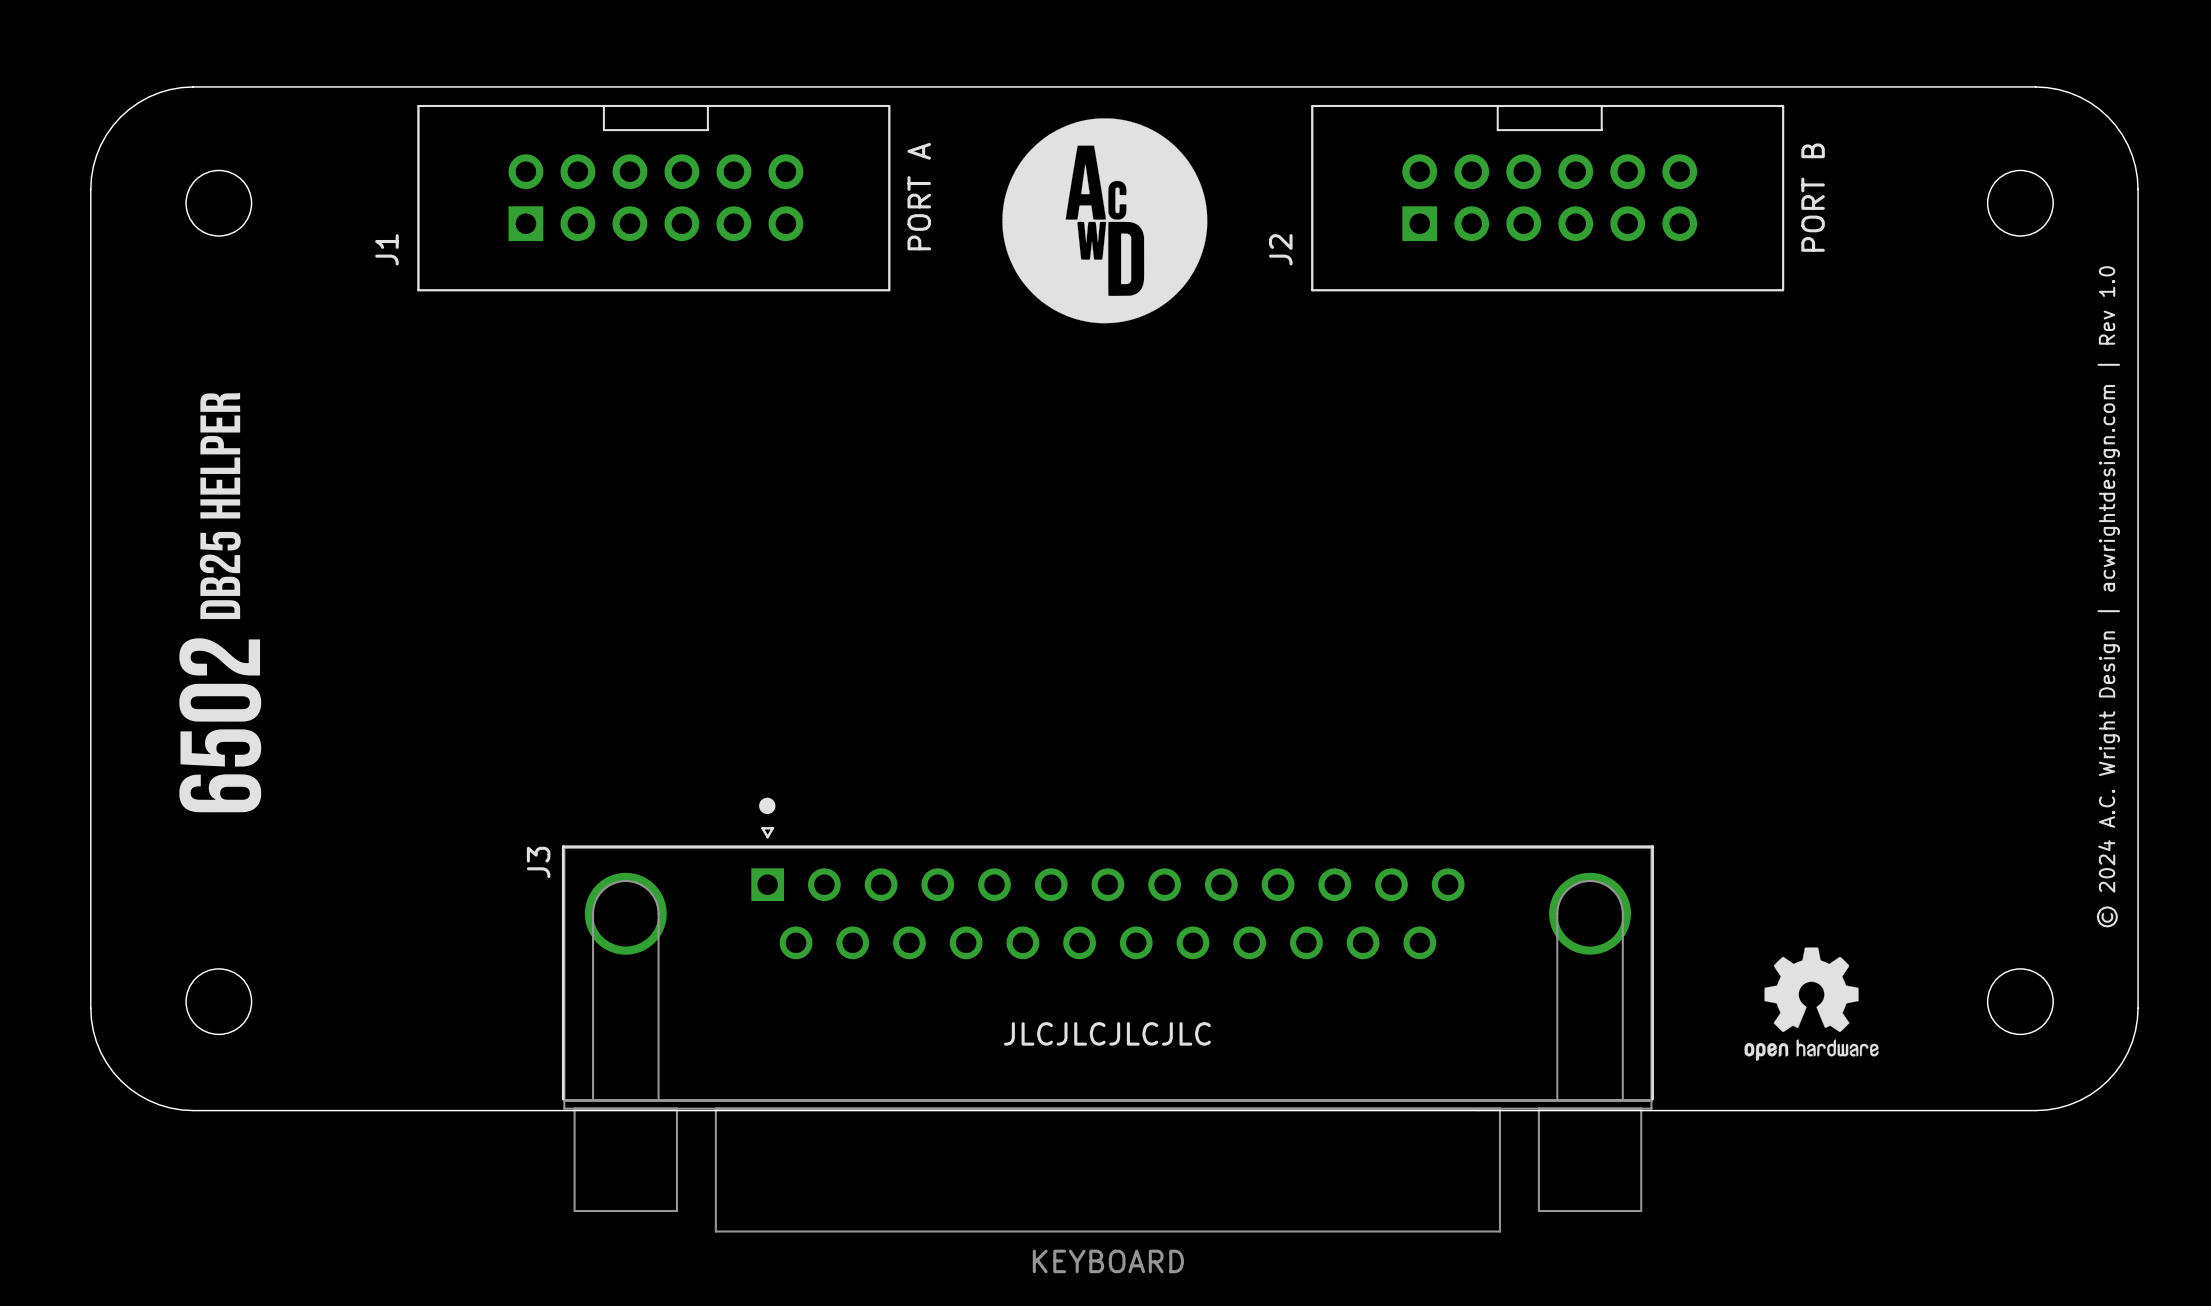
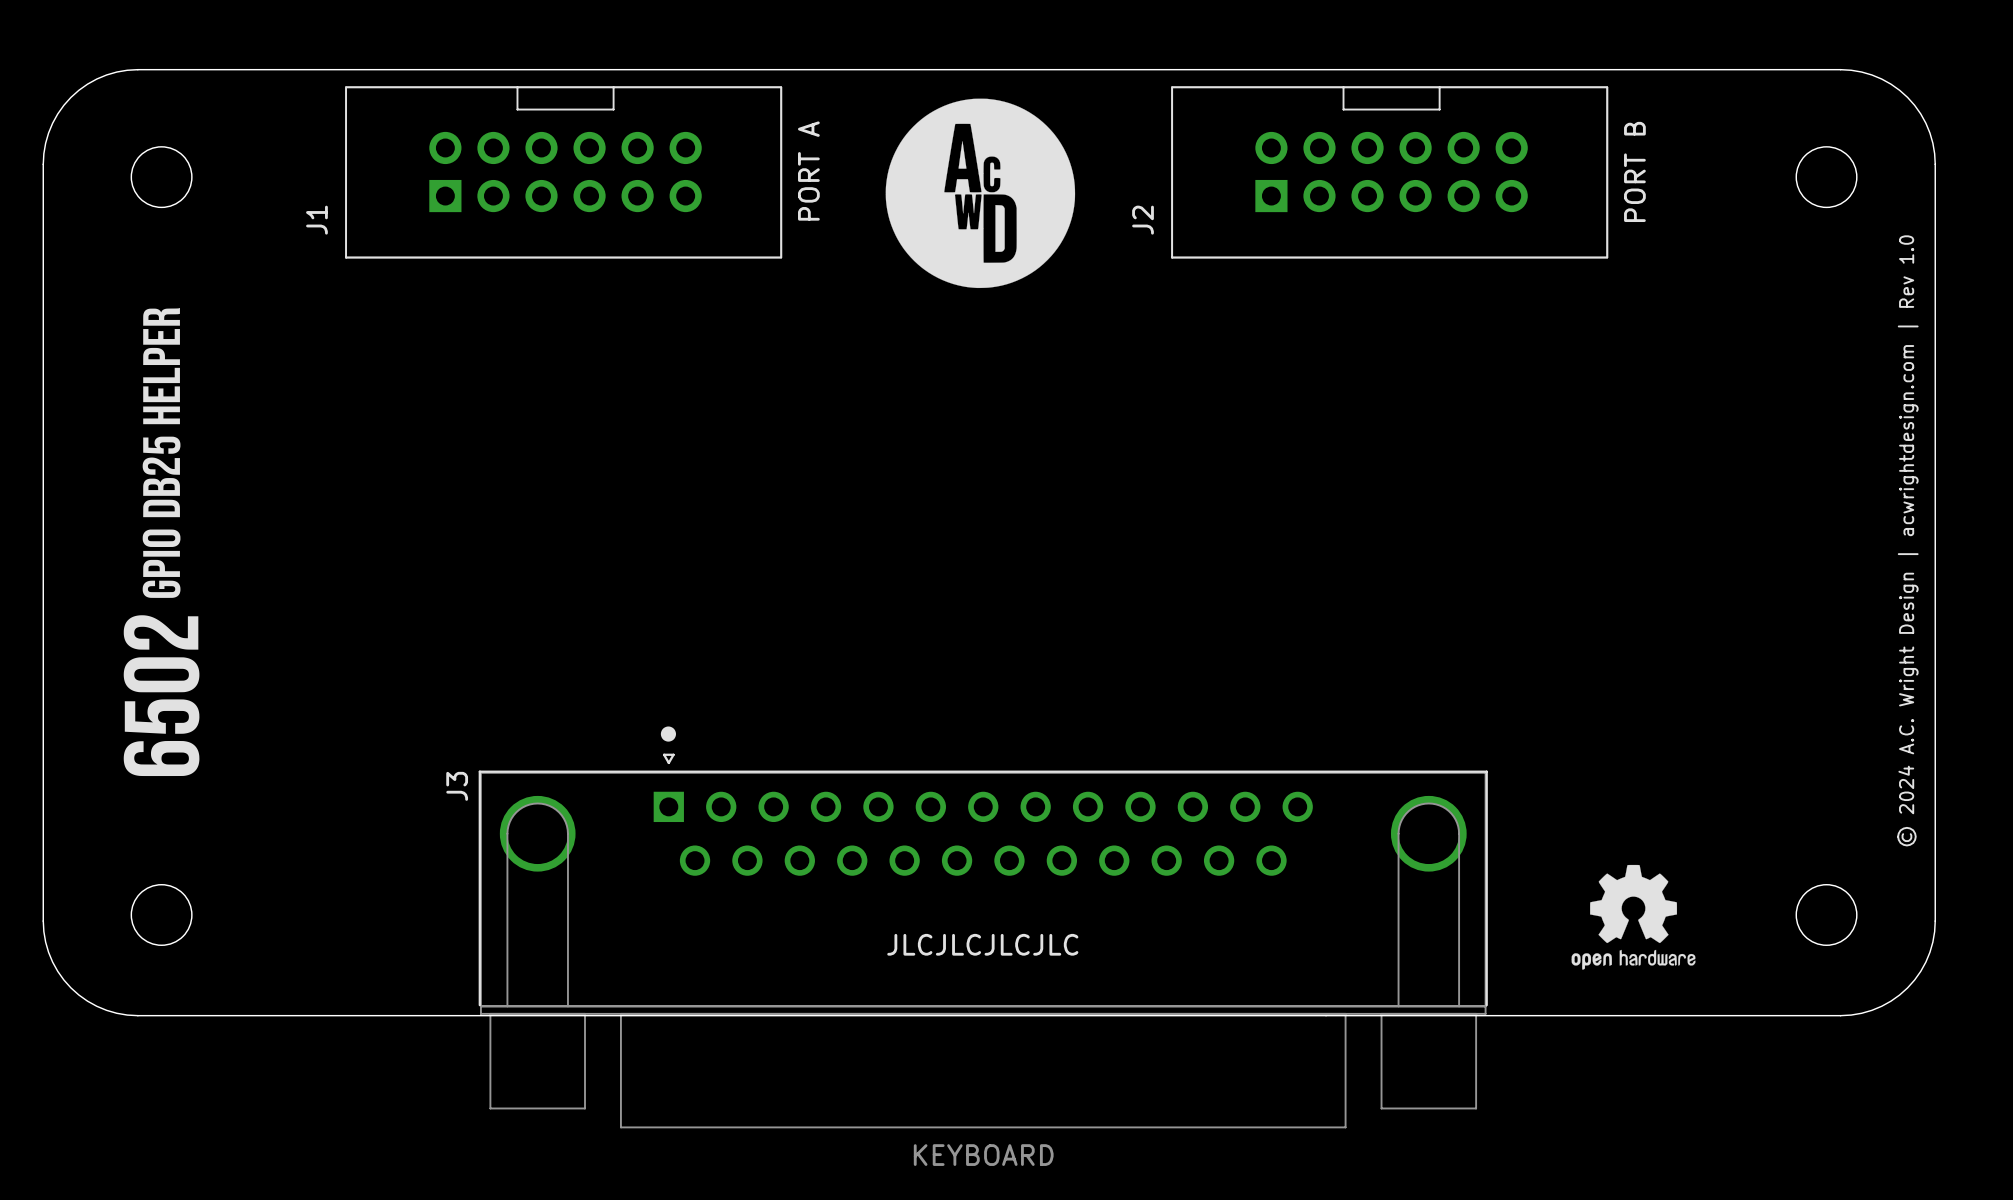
drawing shape: [179, 392, 262, 813] -> [123, 307, 200, 777]

